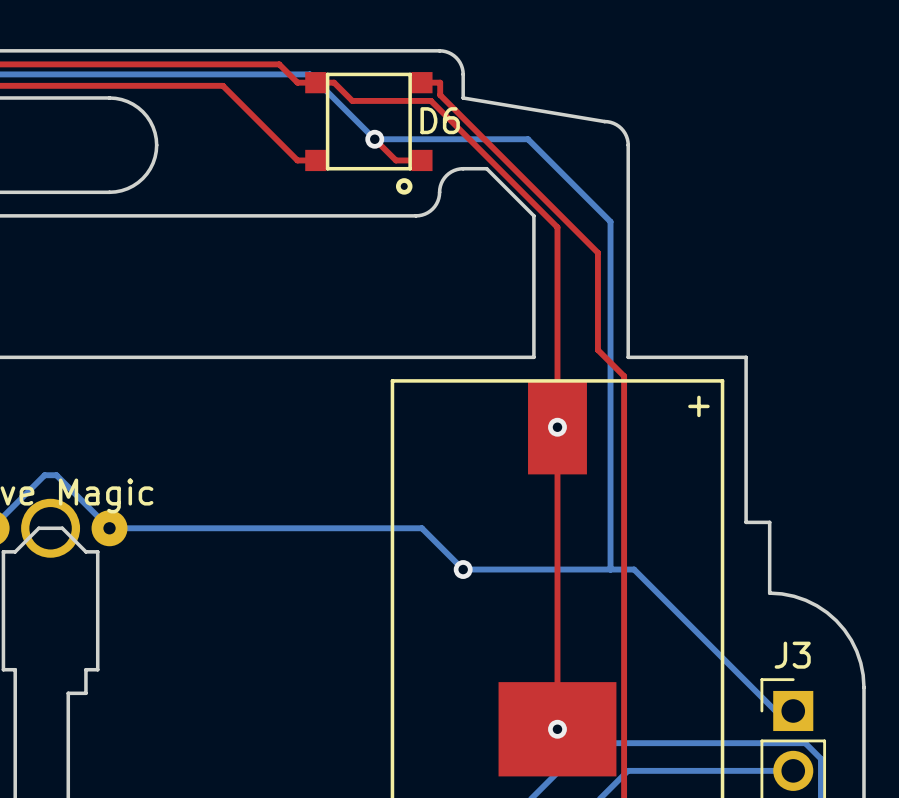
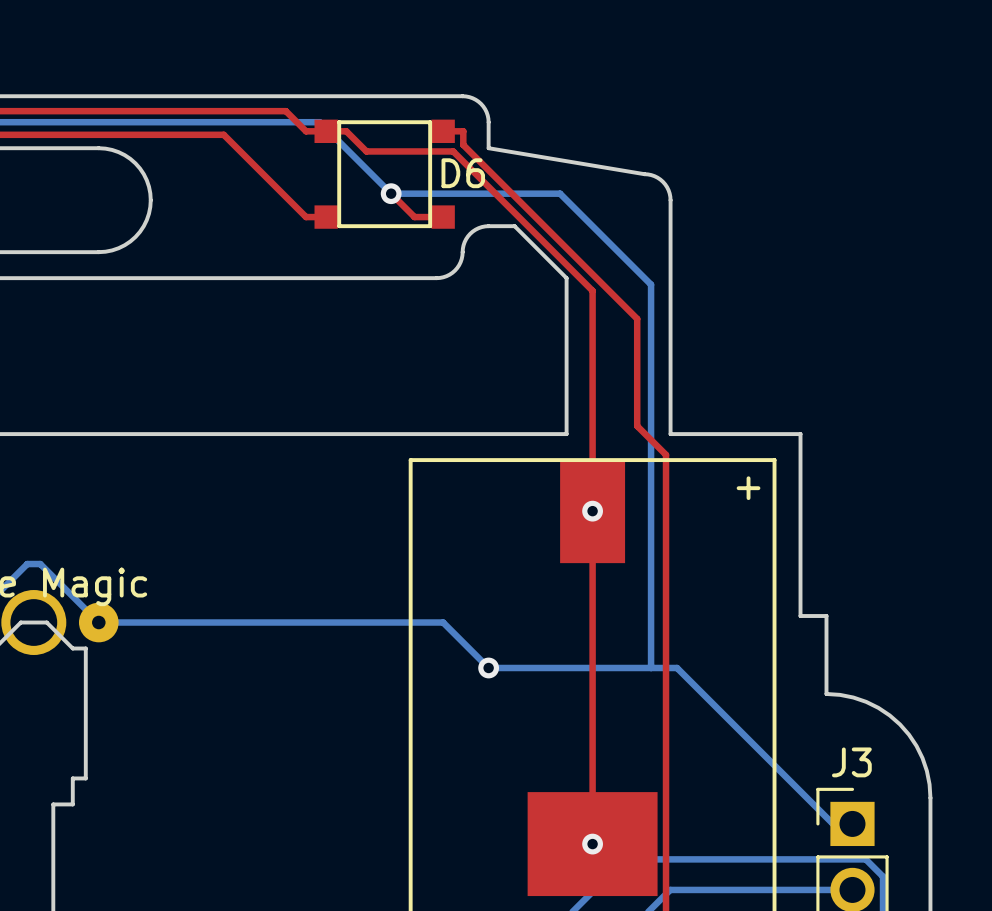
drawing: [395, 178, 413, 195] -> none

